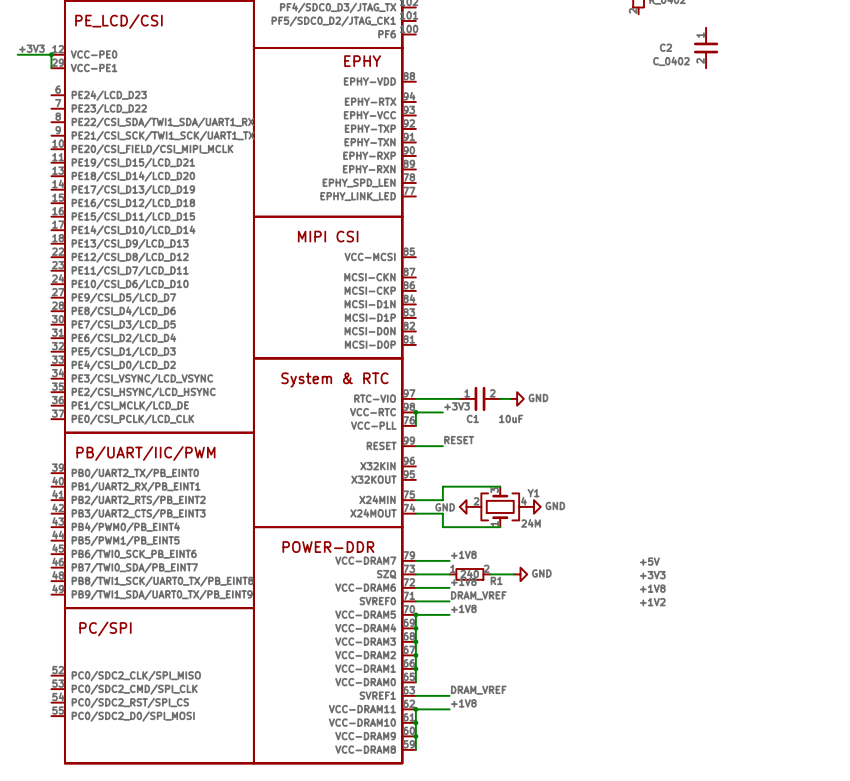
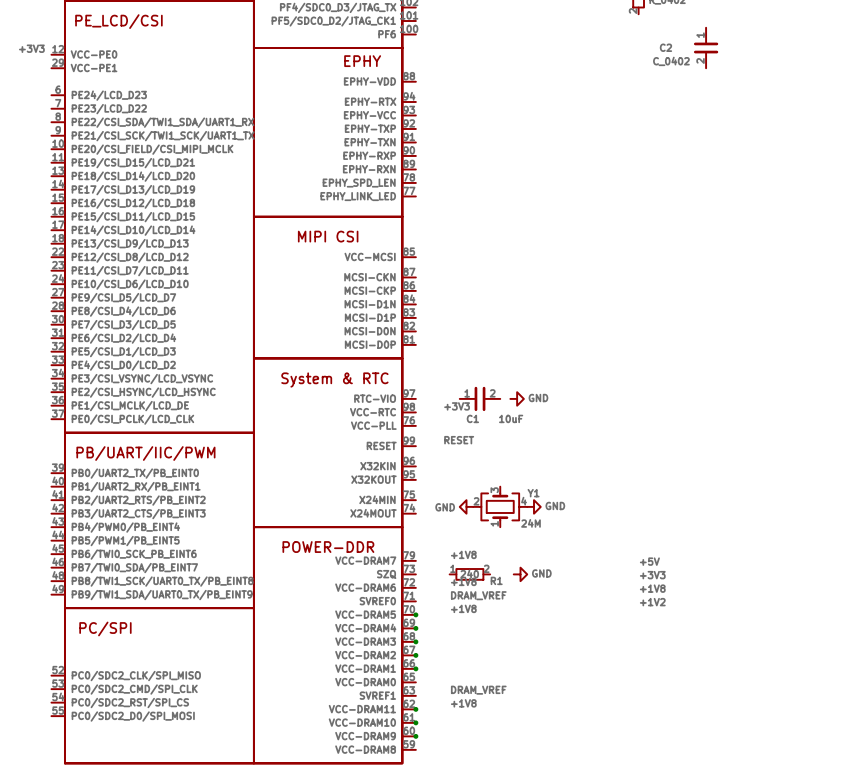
wire: (17, 54) (51, 54) (51, 68) -> none
junction: (51, 54) -> none
wire: (415, 398) (459, 398) -> none
wire: (500, 398) (510, 398) -> none
junction: (415, 412) -> none
wire: (442, 412) (415, 412) (415, 425) -> none
wire: (415, 446) (442, 446) -> none
wire: (500, 486) (442, 486) (442, 500) (415, 500) -> none
wire: (415, 513) (442, 513) (442, 527) (500, 527) -> none
wire: (415, 560) (449, 560) -> none
wire: (415, 574) (449, 574) -> none
wire: (490, 574) (513, 574) -> none
wire: (415, 587) (449, 587) -> none
wire: (415, 601) (449, 601) -> none
wire: (449, 614) (415, 614) (415, 682) -> none
wire: (415, 695) (449, 695) -> none
wire: (449, 709) (415, 709) (415, 749) -> none

